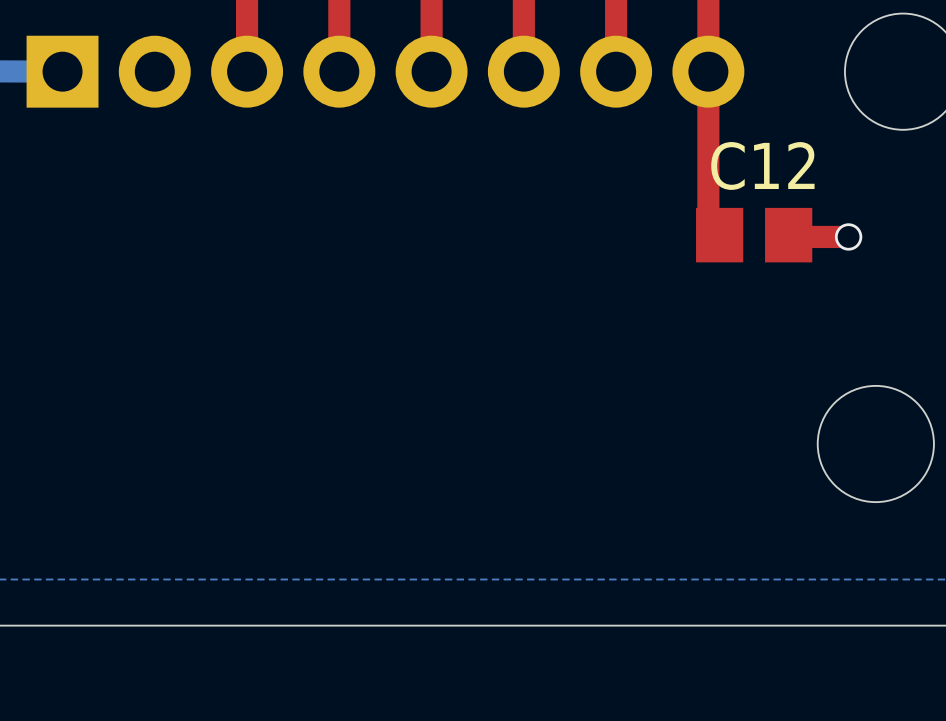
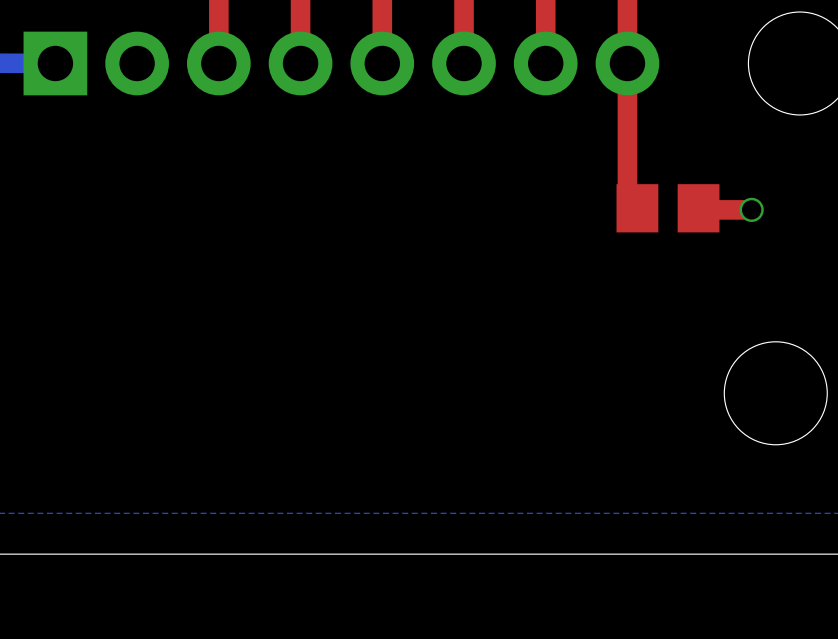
C12 name: C12 (762, 165) -> none

